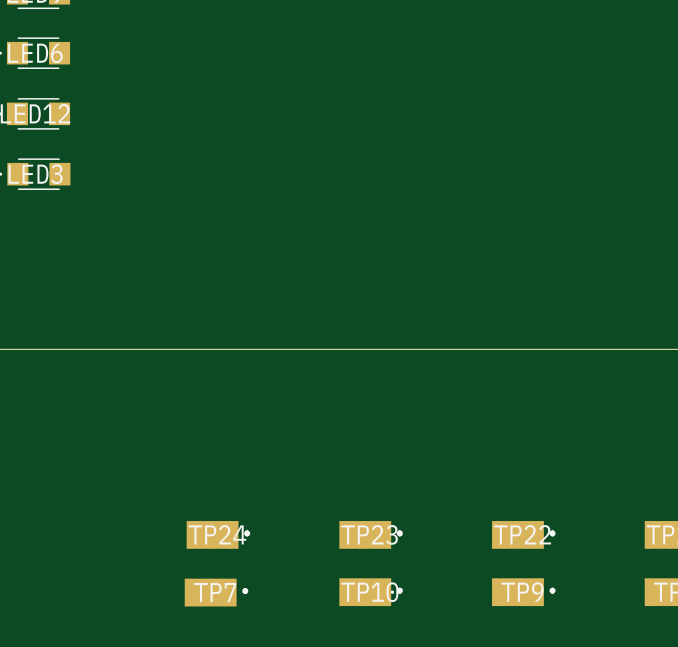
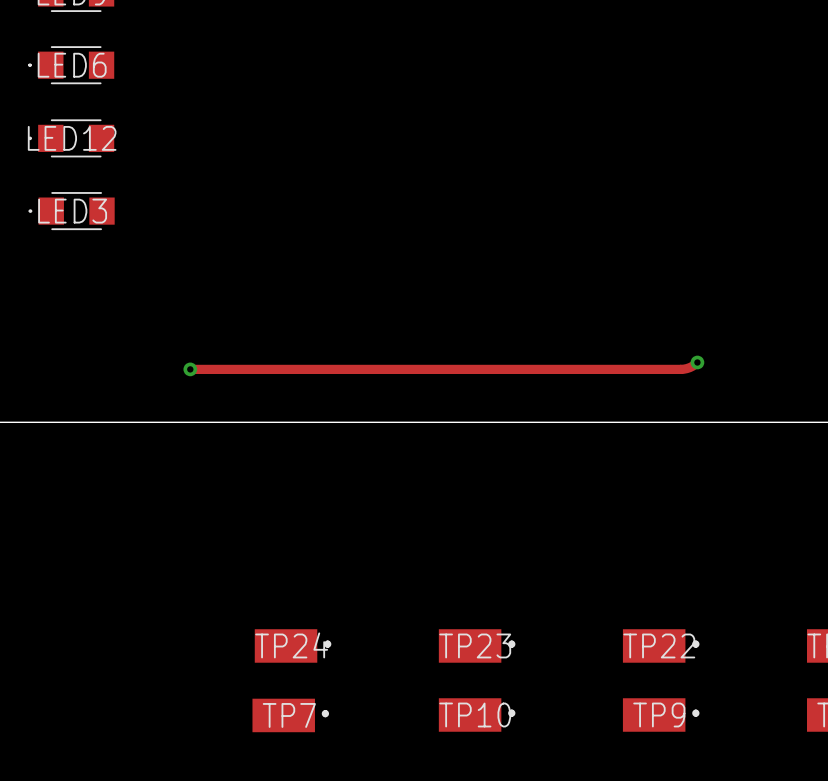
track: none -> (697, 362) (689, 367) (680, 369) (190, 369)
via: none -> (697, 362)
via: none -> (190, 369)

